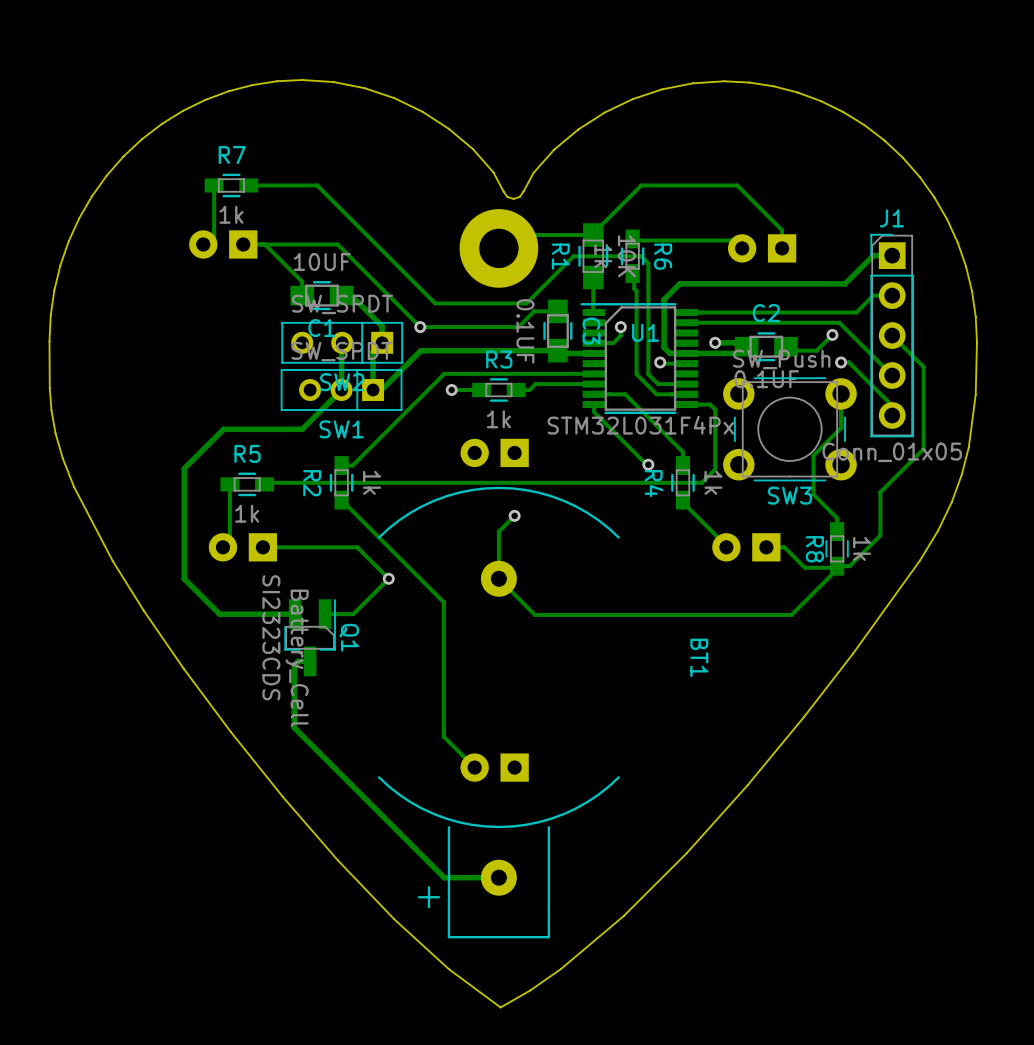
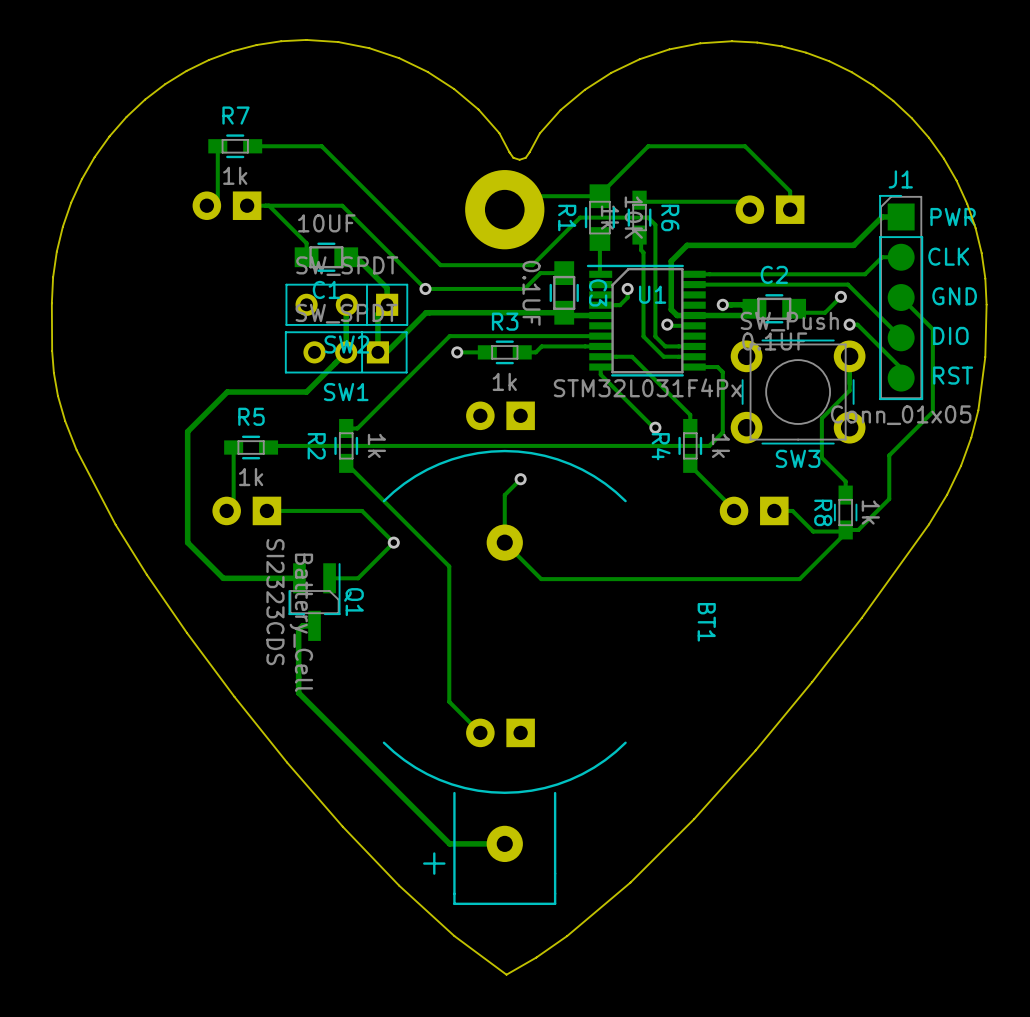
J1 footprint: [870, 233, 915, 438] -> [879, 194, 924, 401]
text: none -> PWR (953, 217)
text: none -> CLK (948, 256)
text: none -> GND (954, 296)
text: none -> DIO (950, 335)
text: none -> RST (953, 375)

